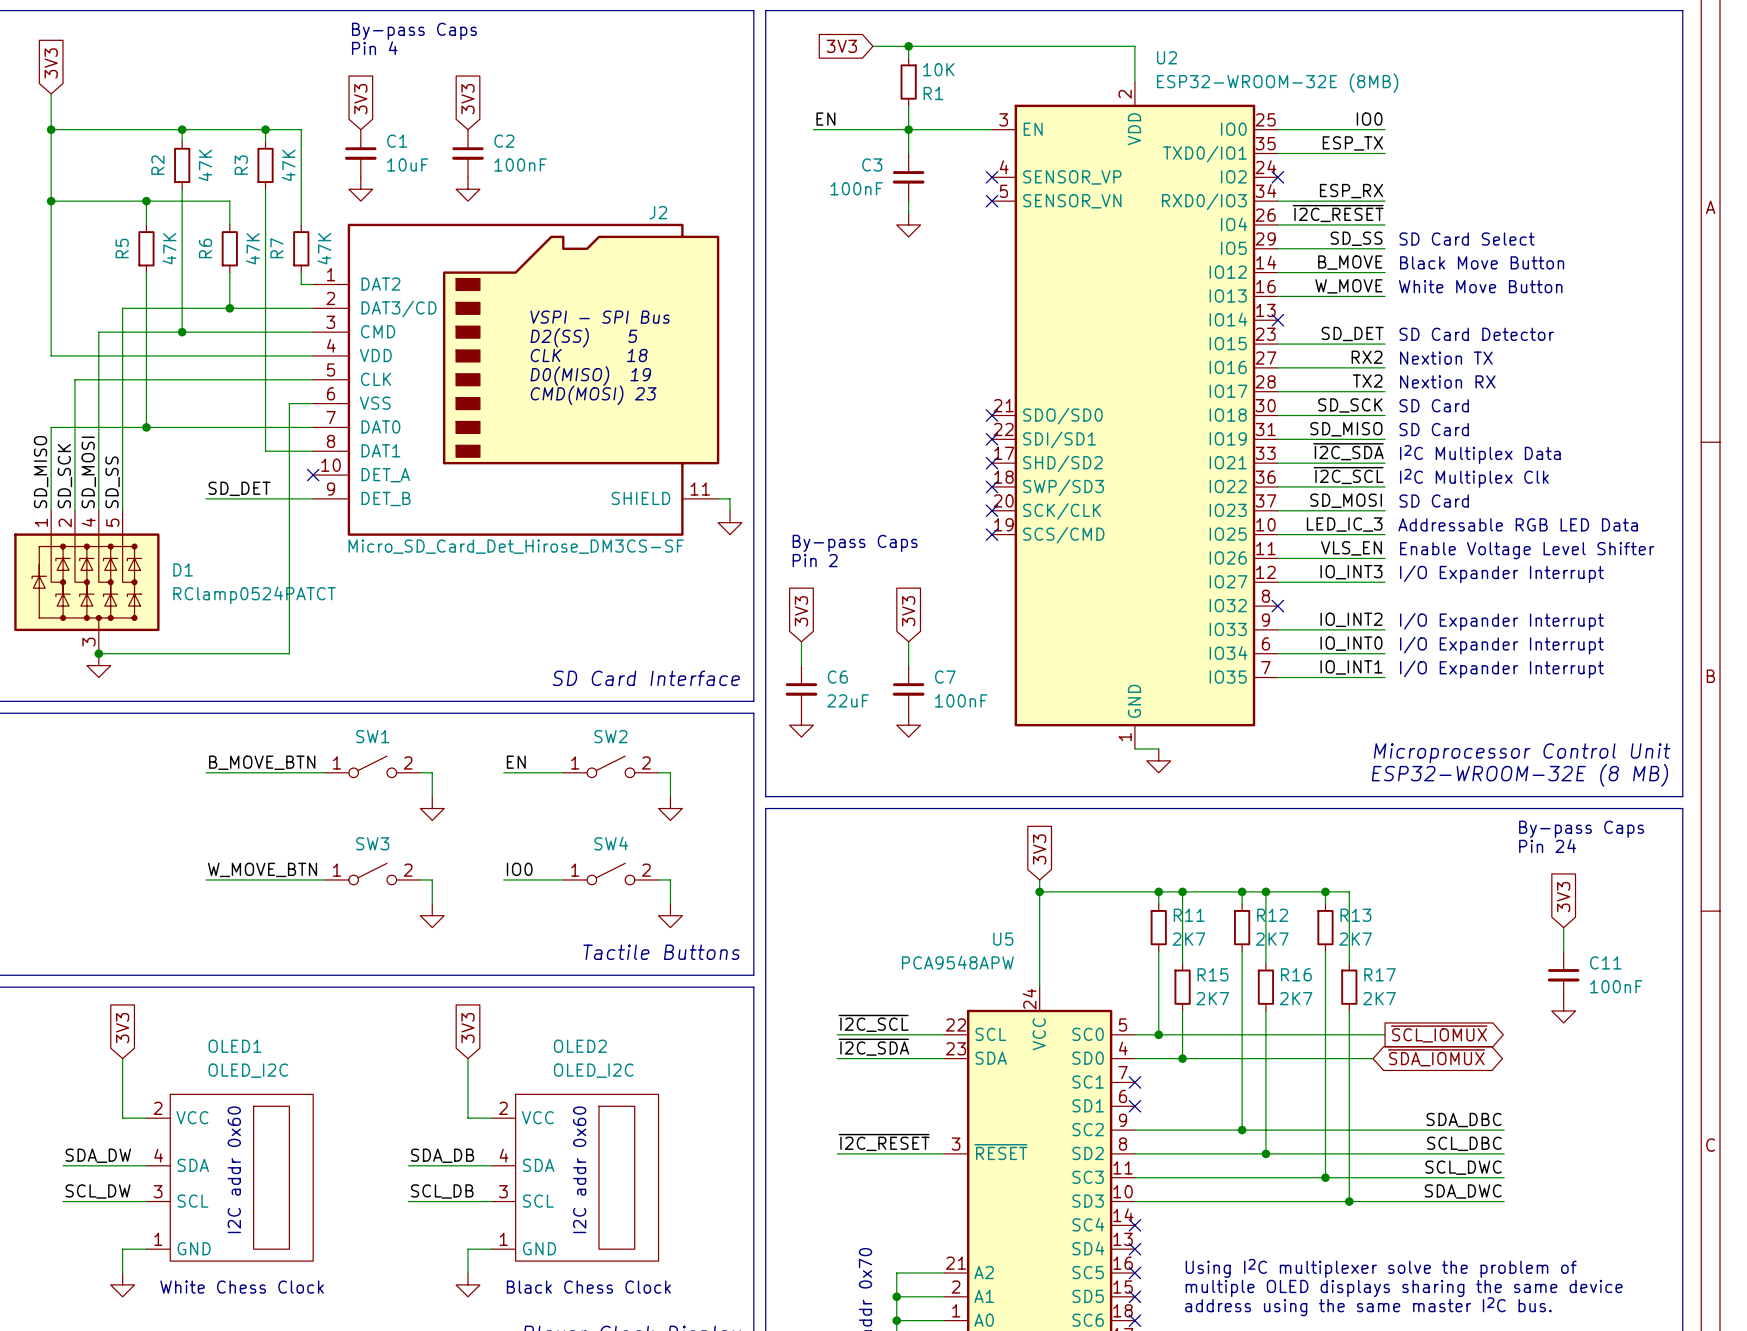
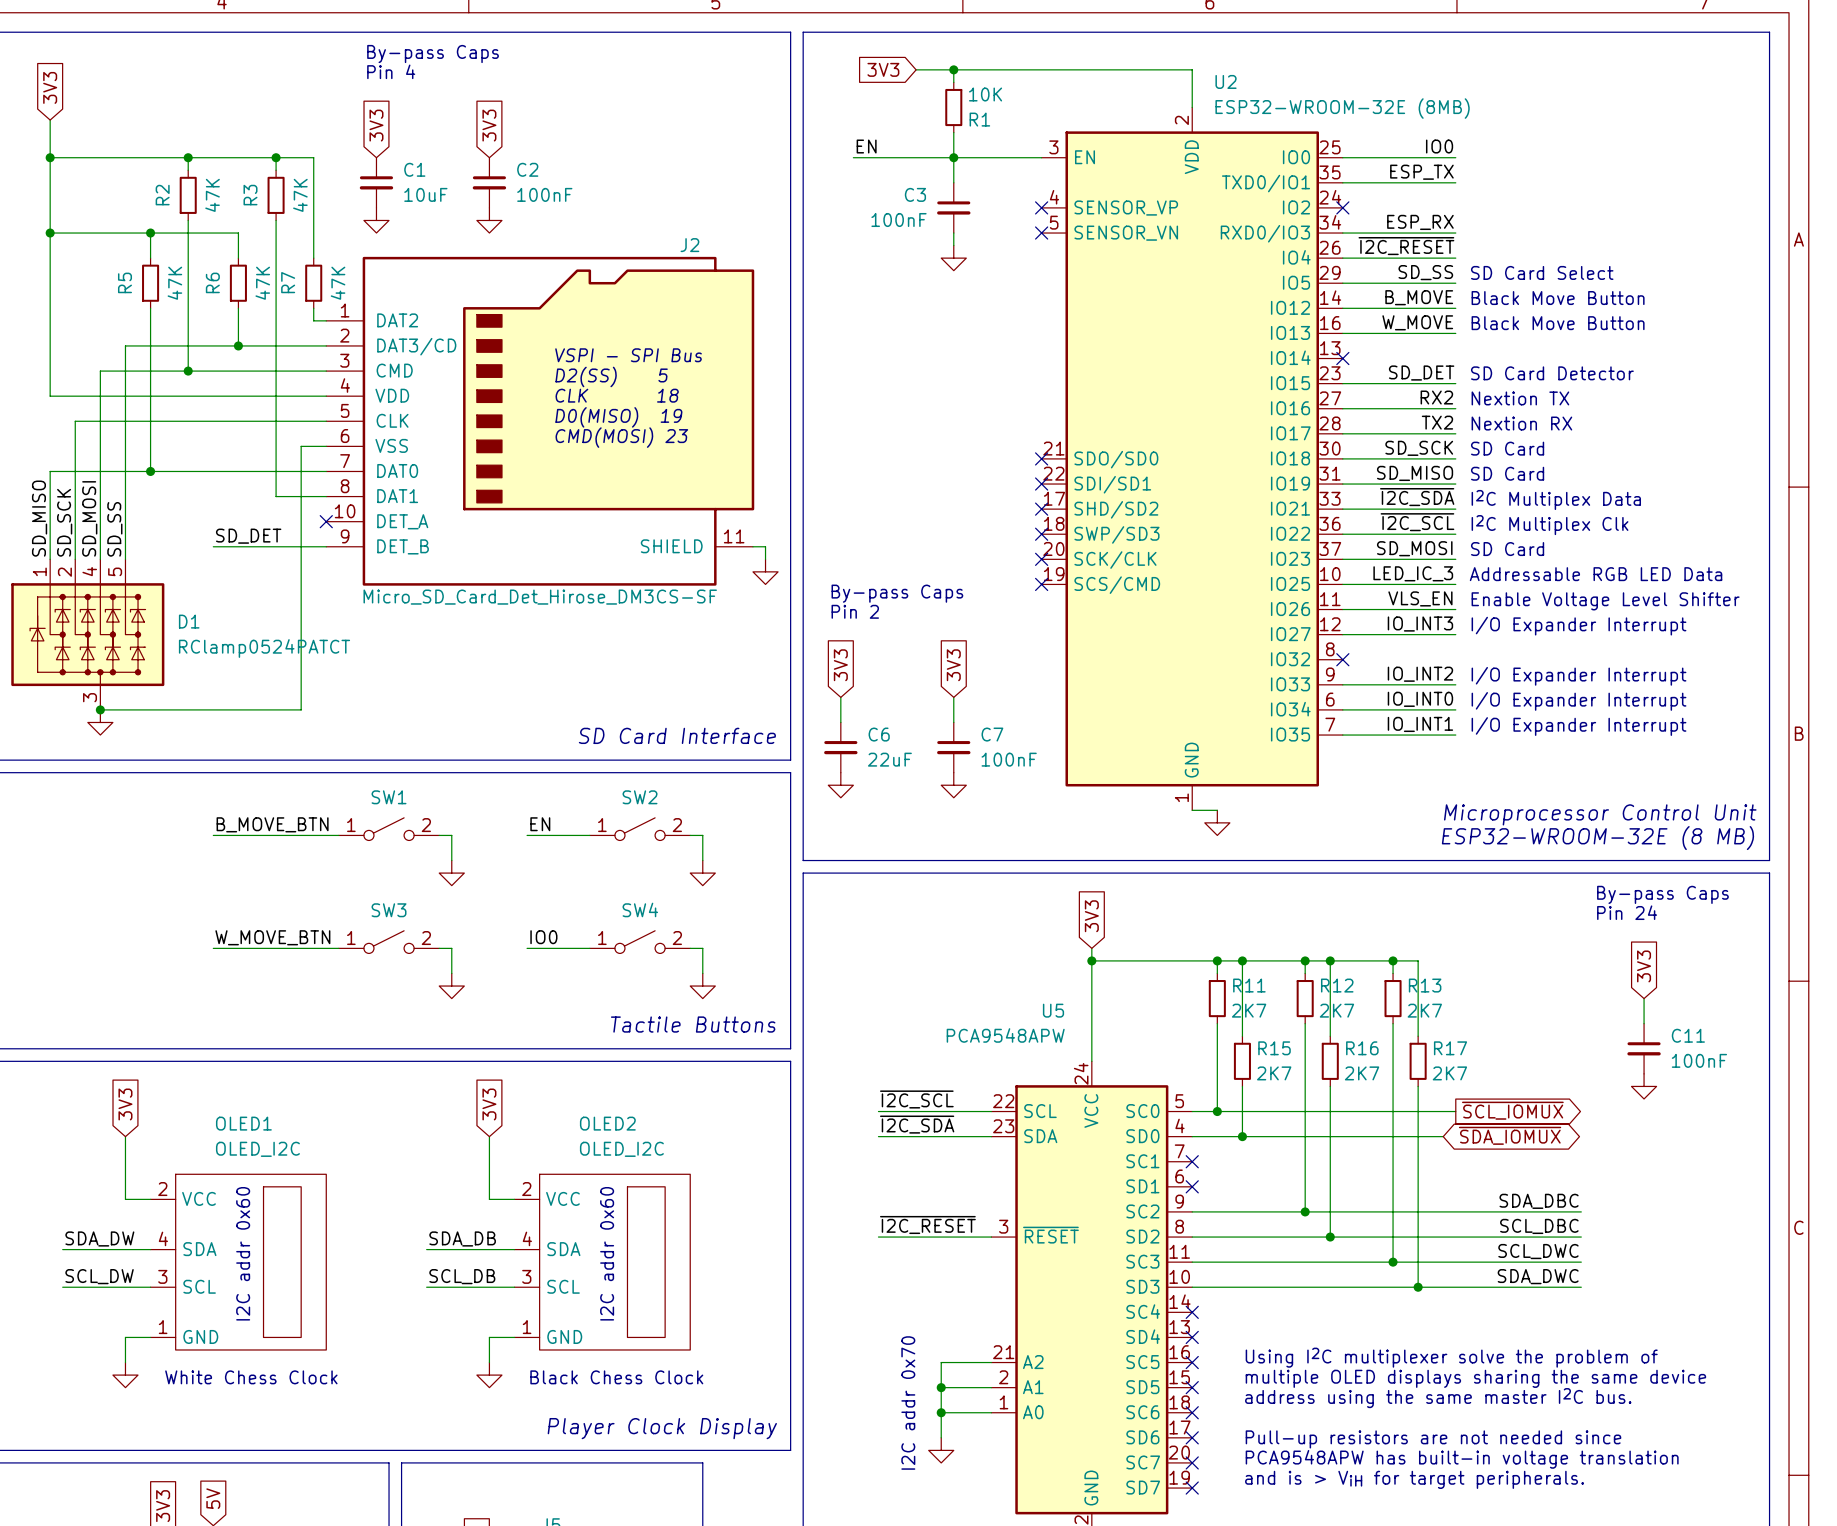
text: White Move Button (1480, 286) -> Black Move Button (1558, 323)

